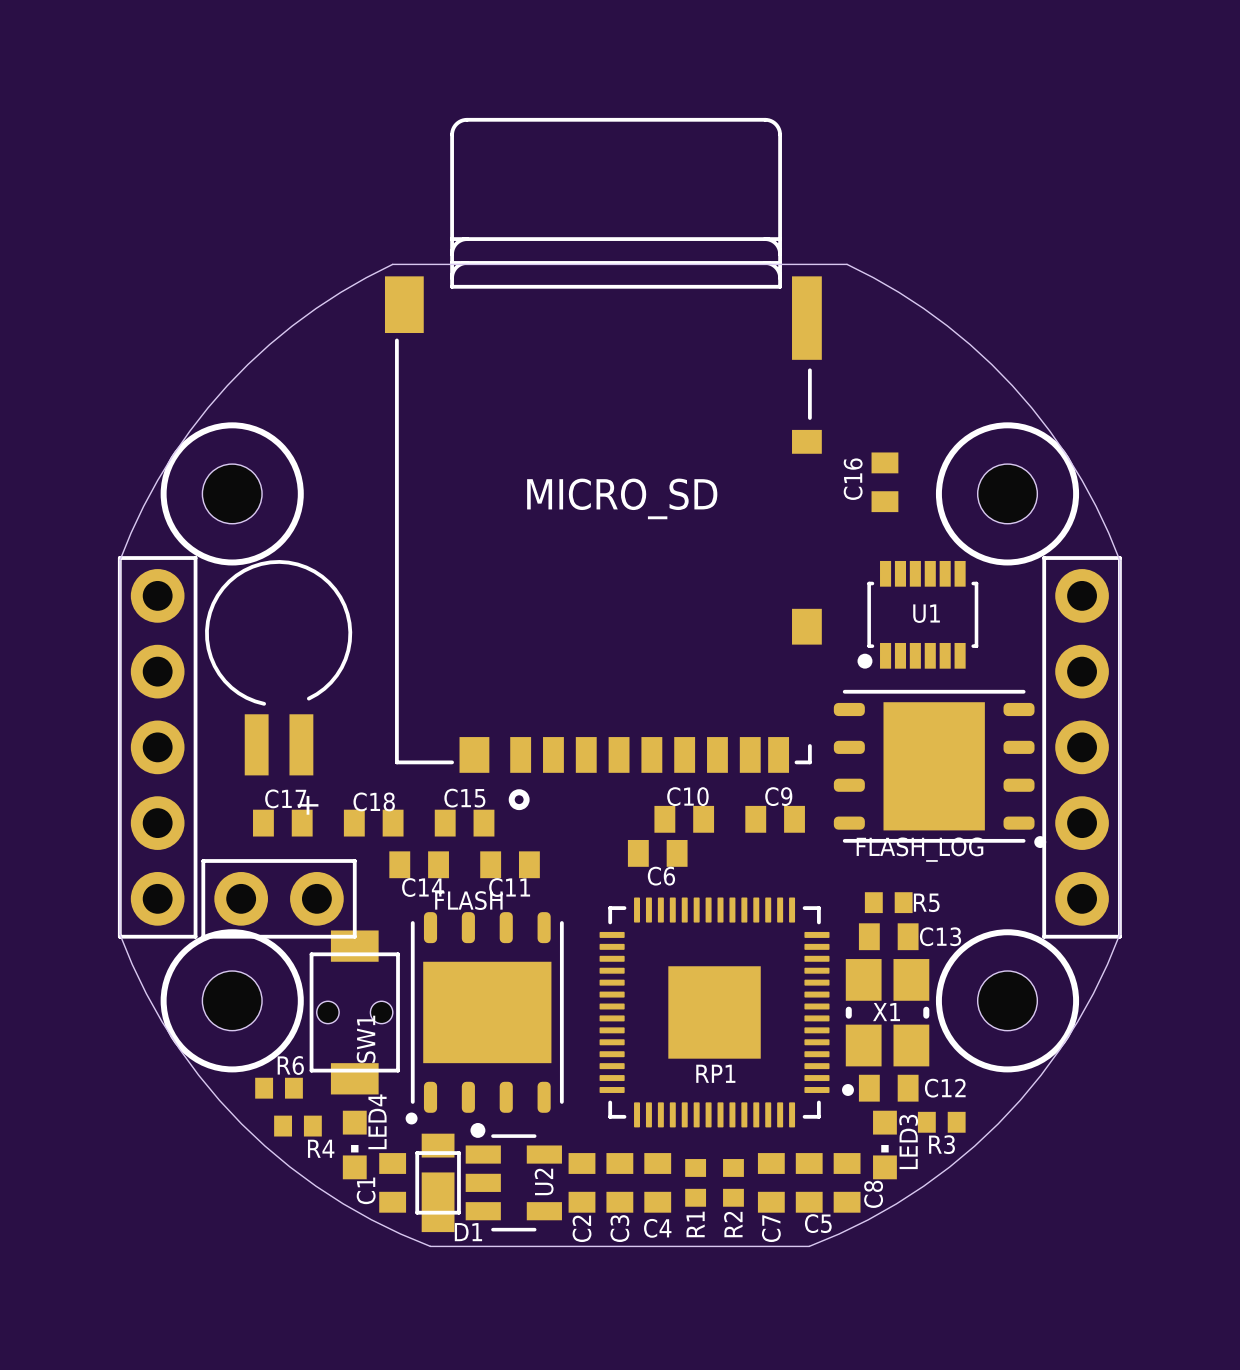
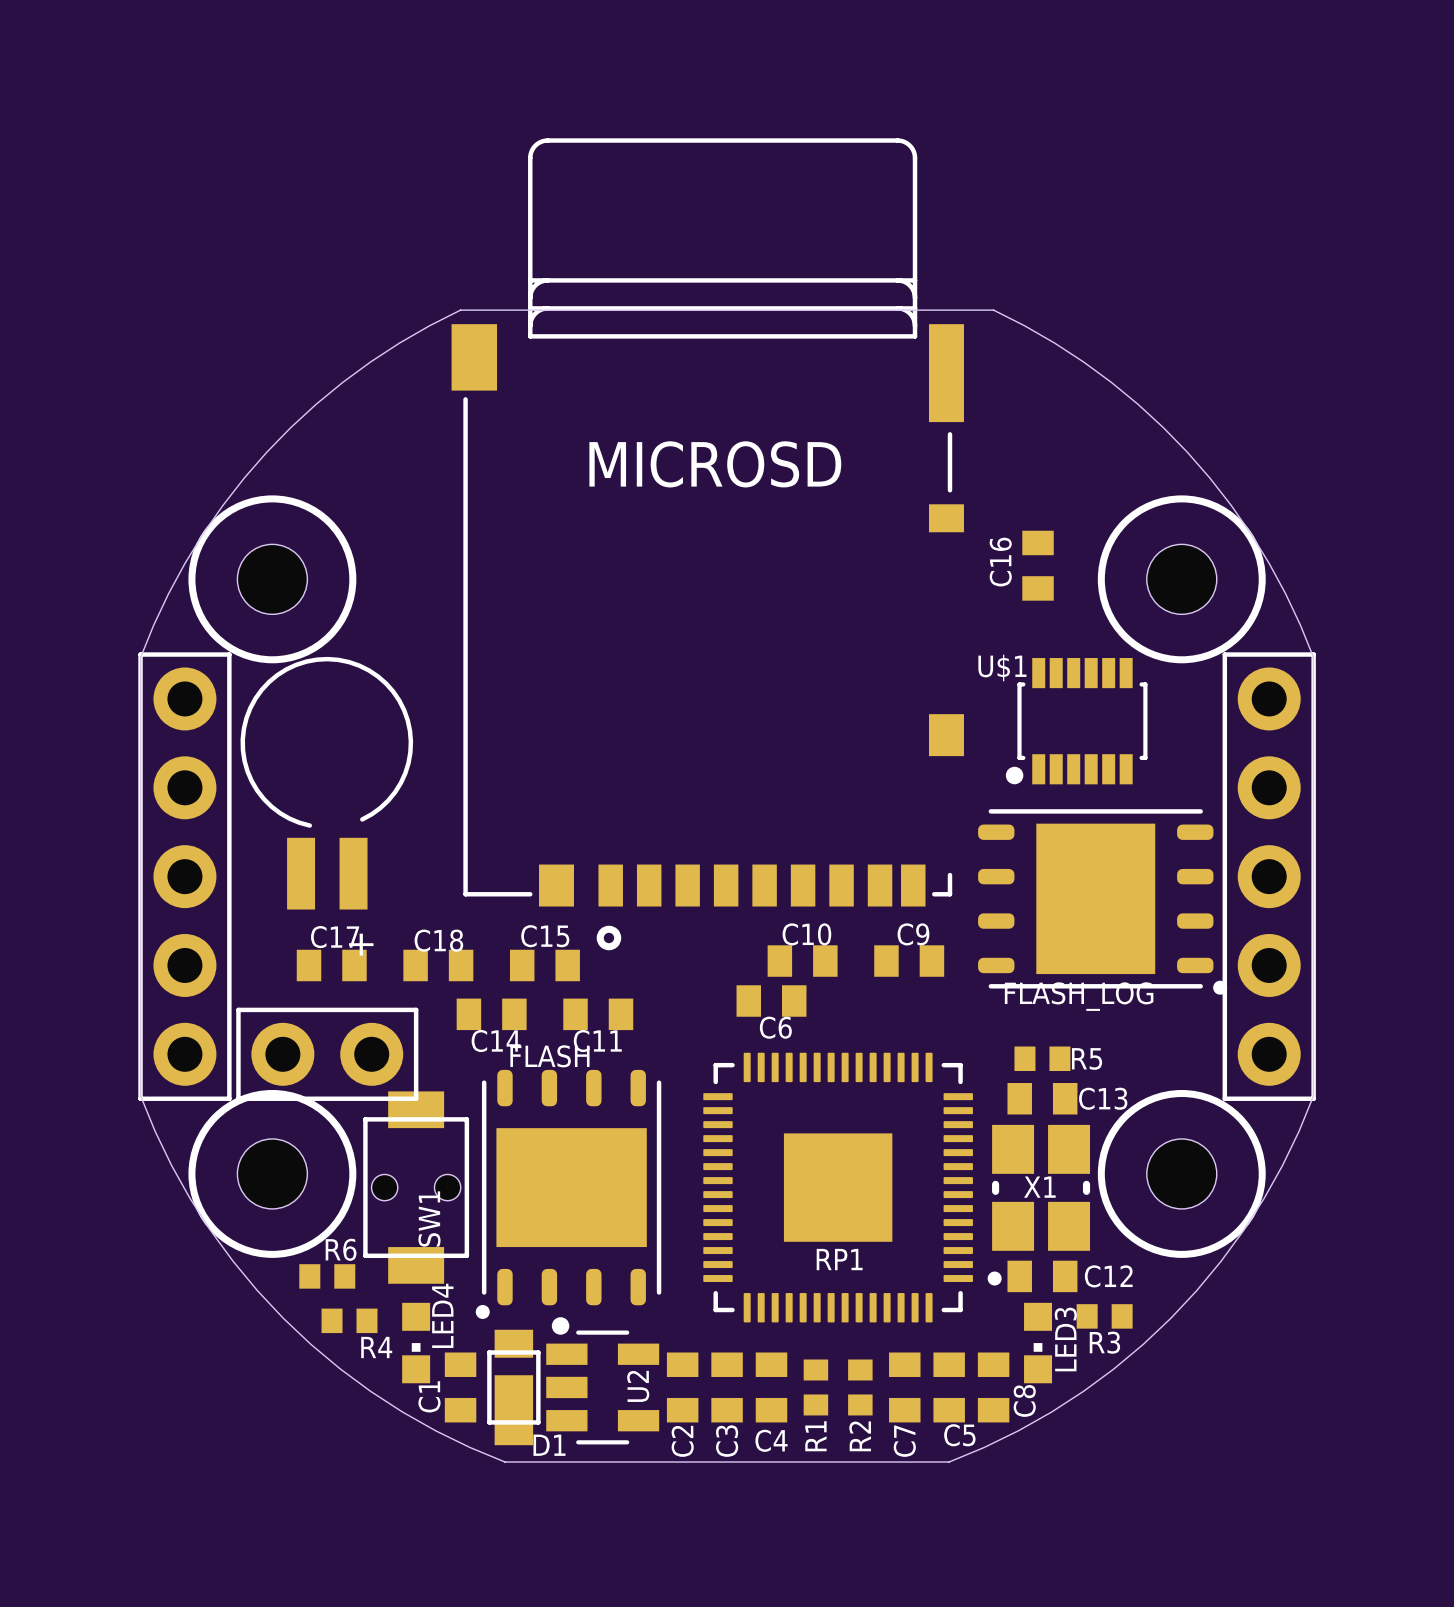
MICRO_SD name: MICRO_SD (622, 498) -> MICROSD (715, 464)
U1 name: U1 (926, 613) -> U$1 (1002, 667)

